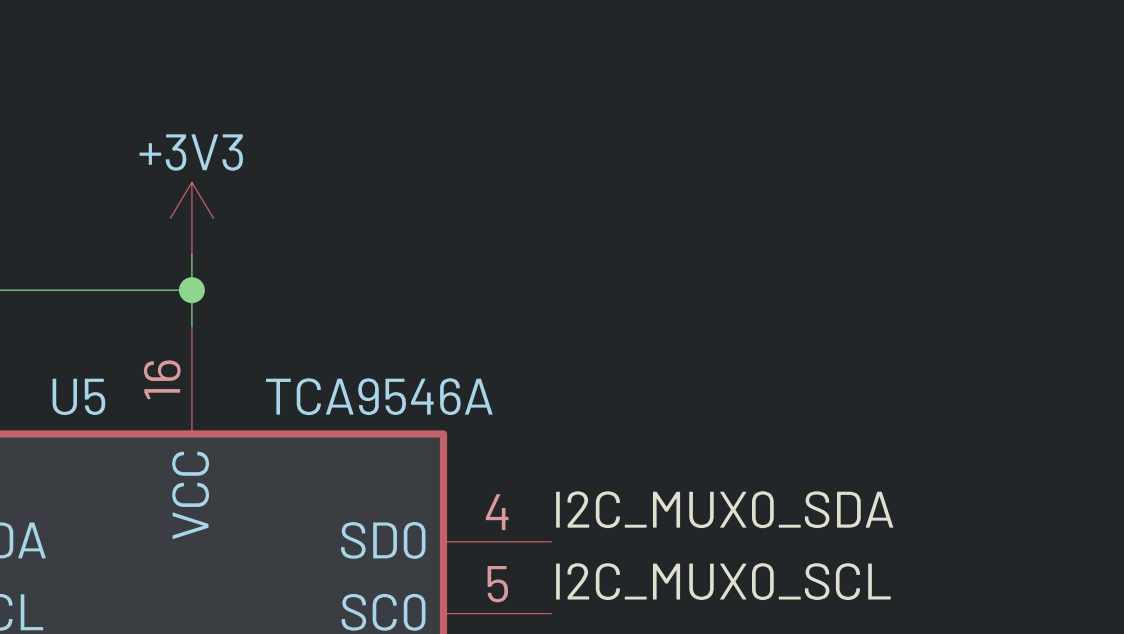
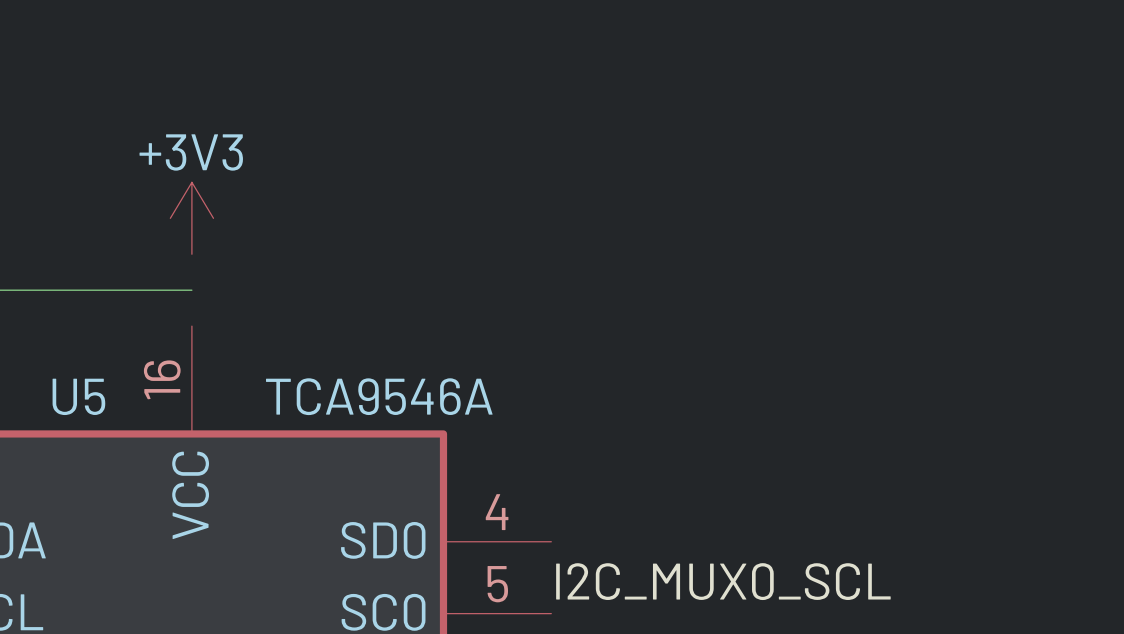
wire: (191, 254) (191, 326) -> none
junction: (191, 290) -> none
label: I2C_MUX0_SDA (724, 509) -> none

